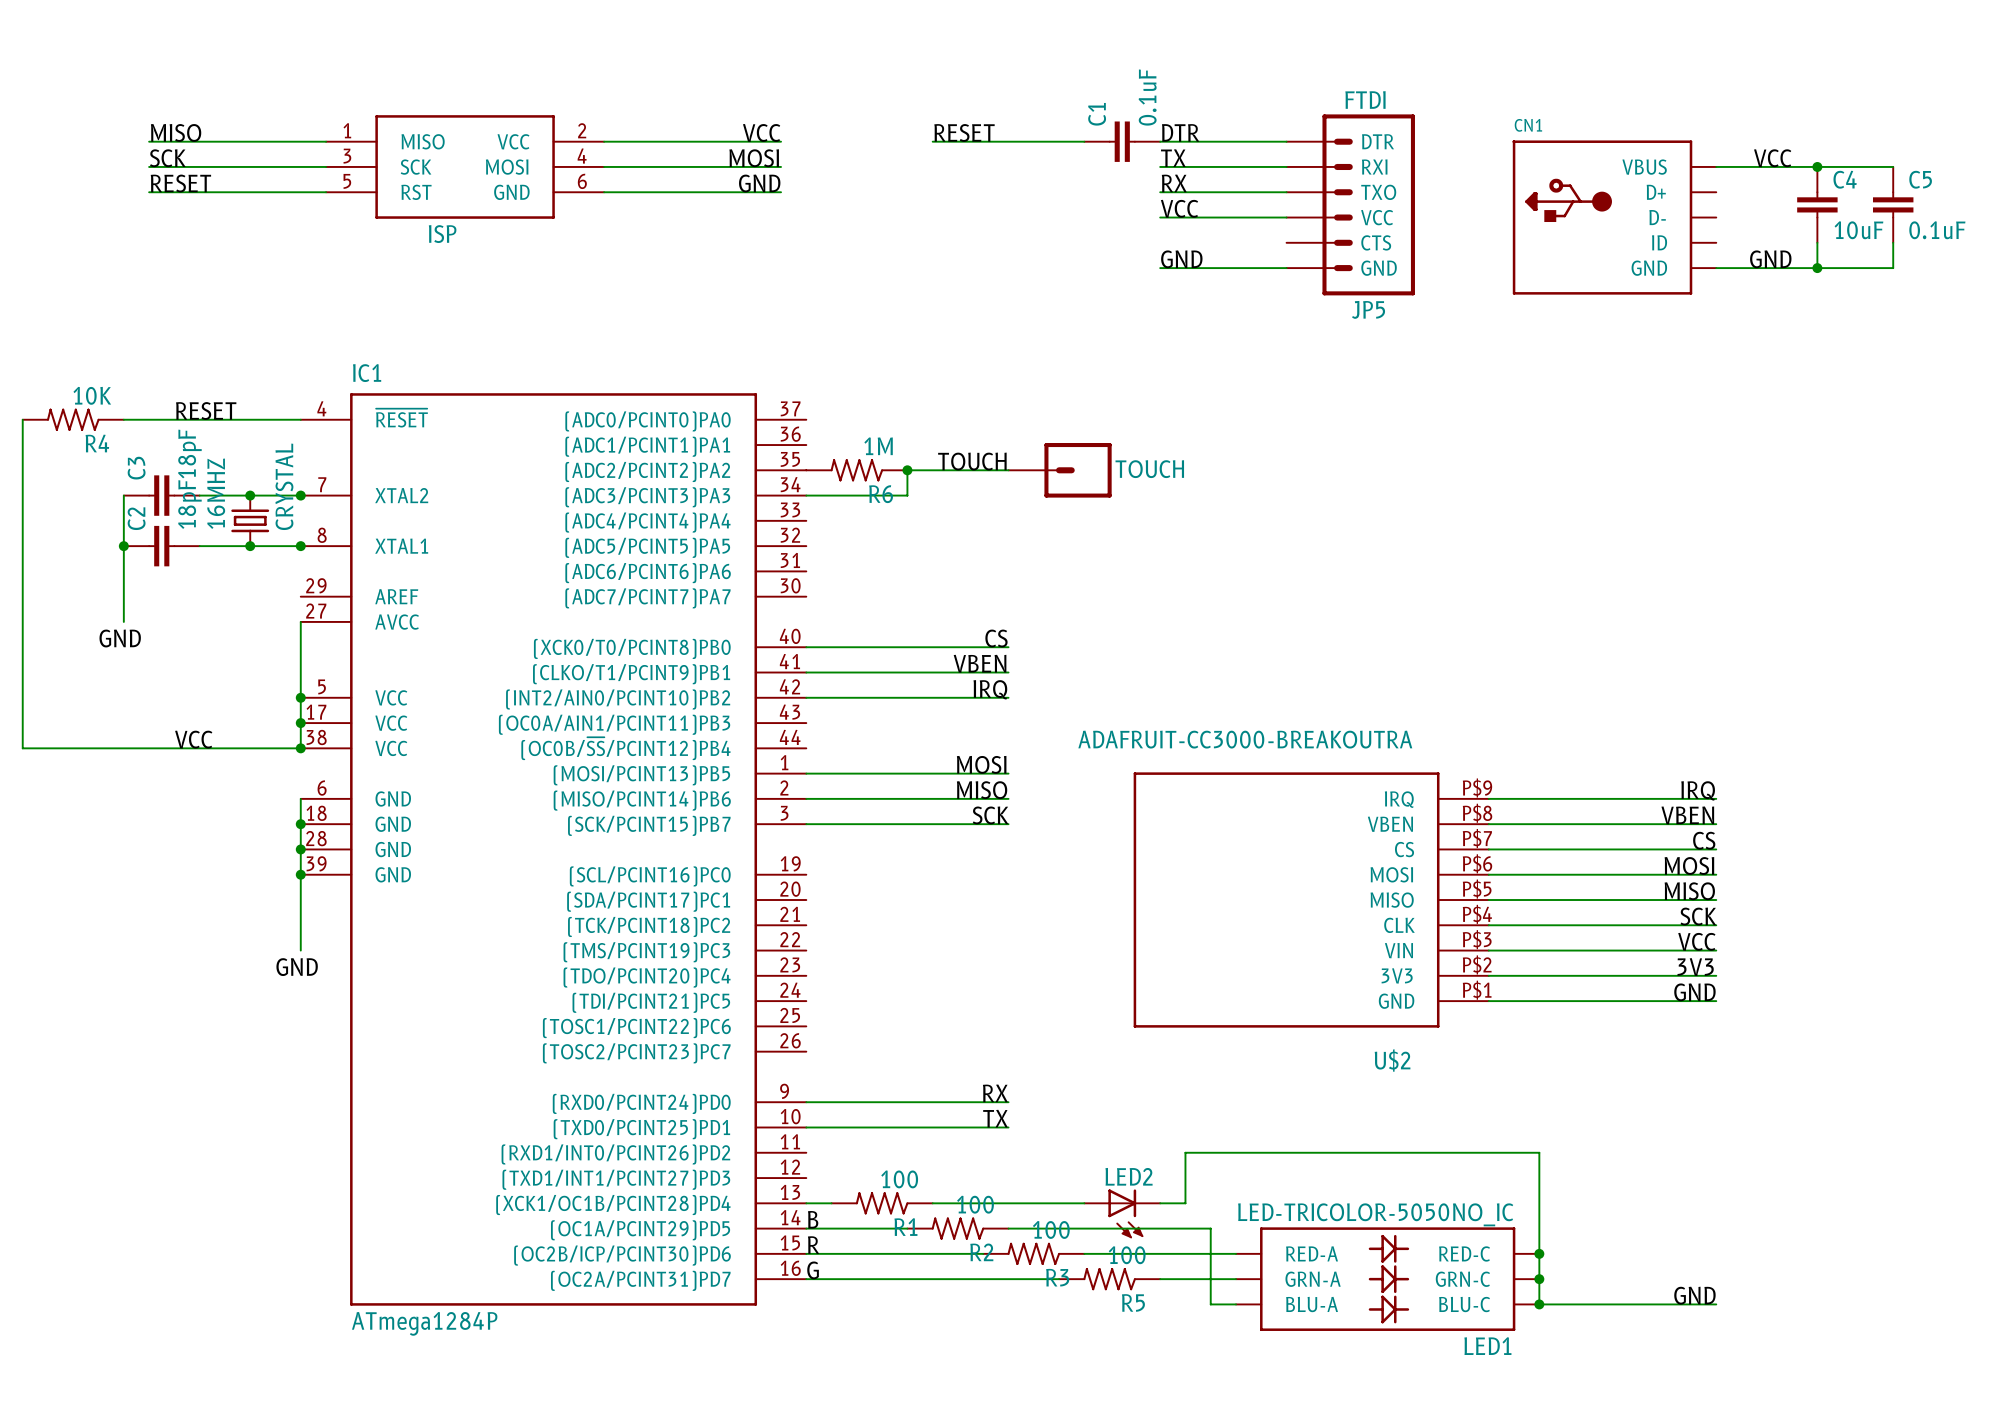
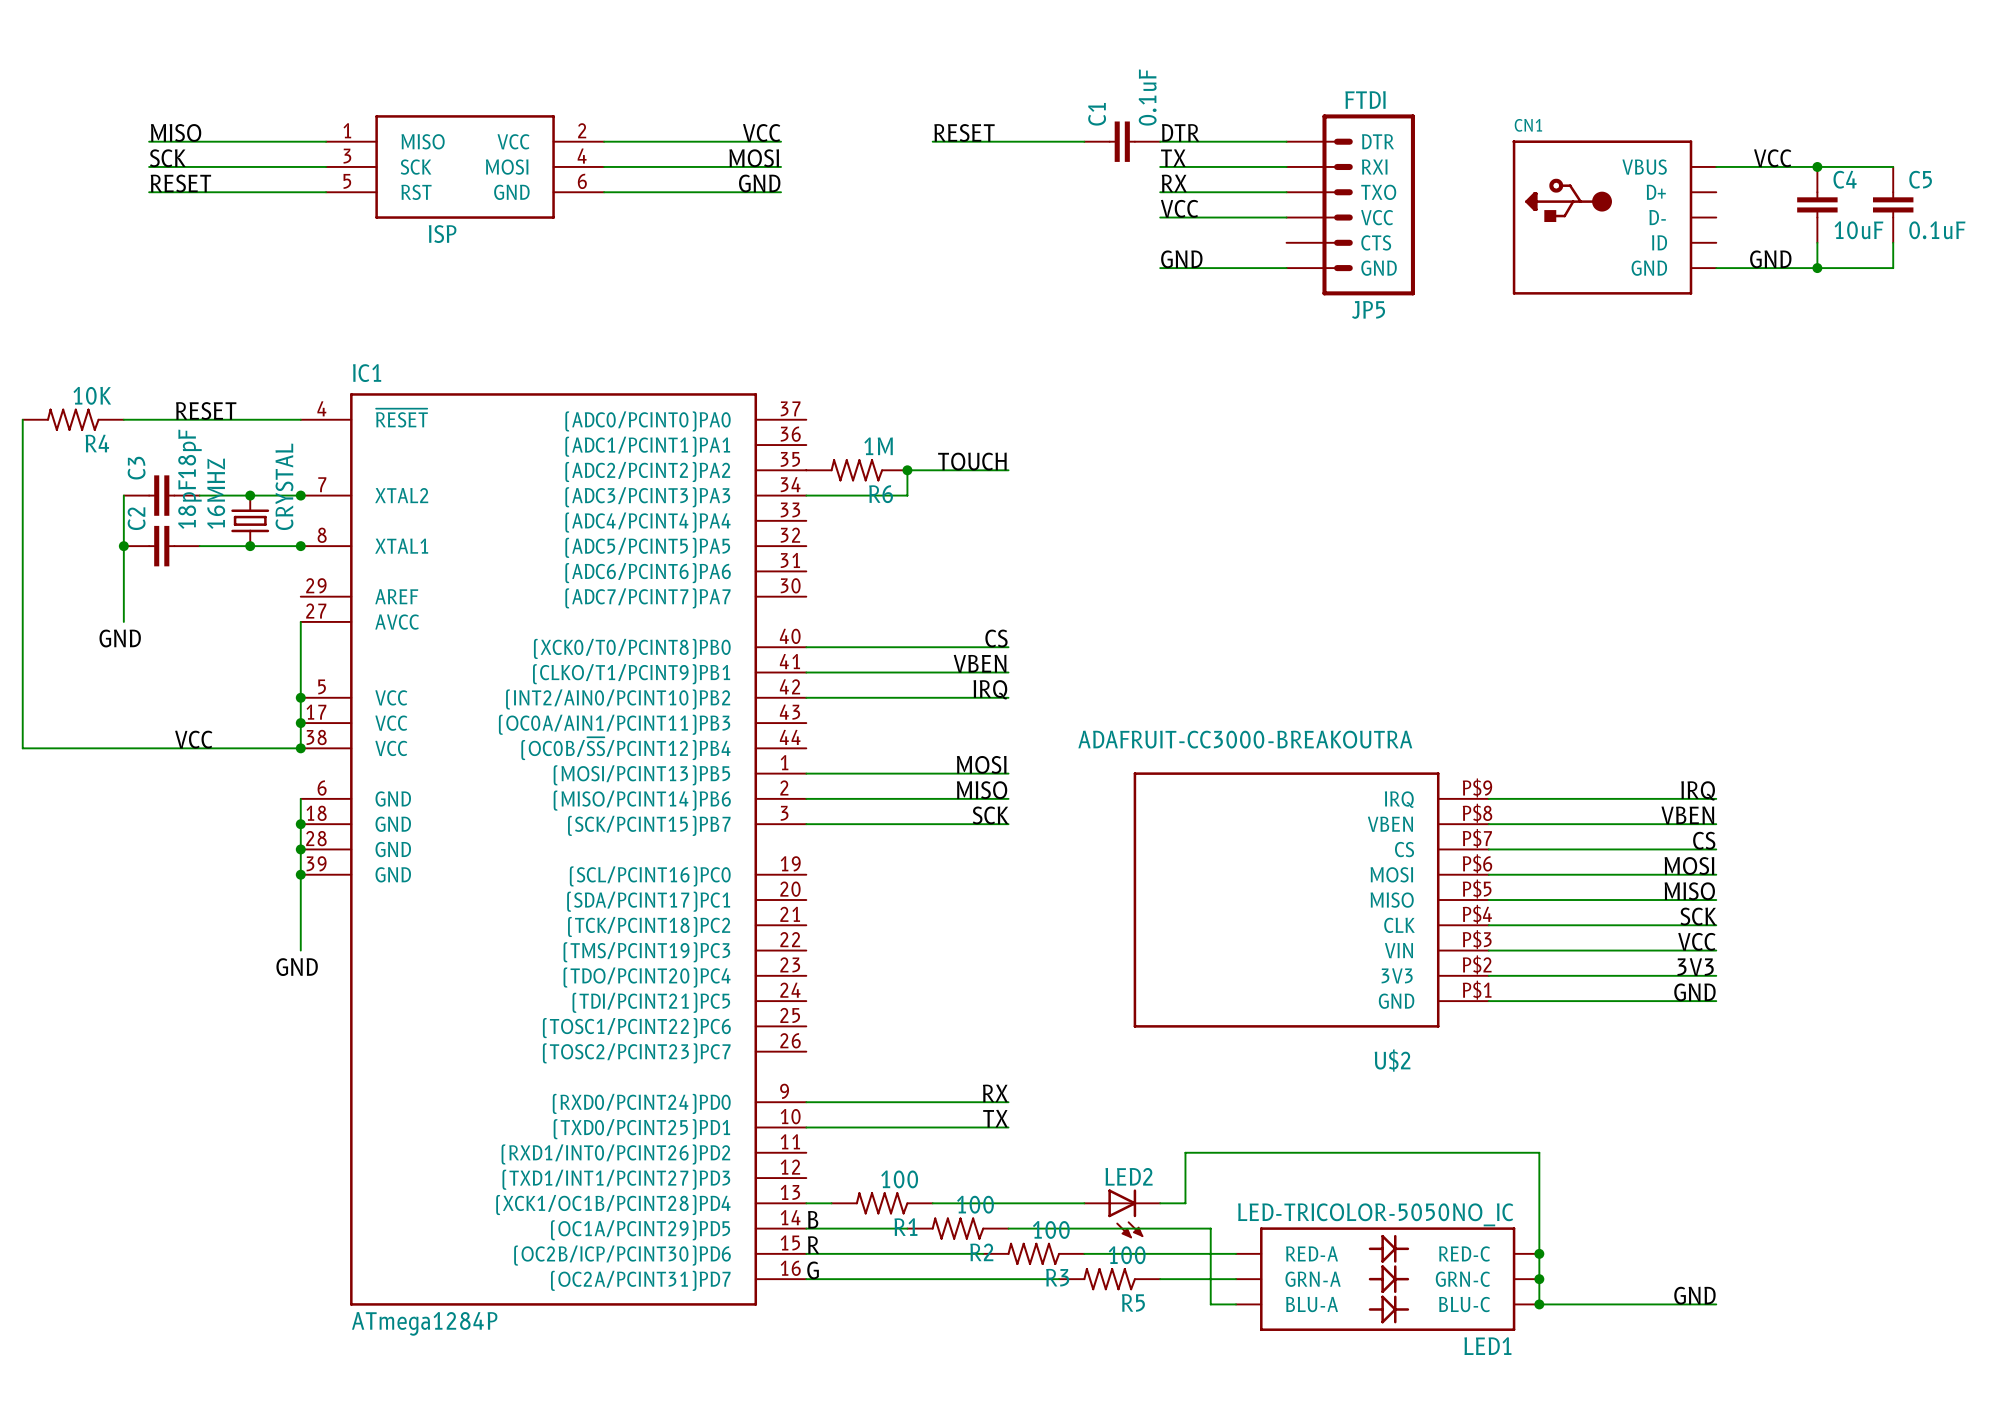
TOUCH: (1060, 470) -> none

